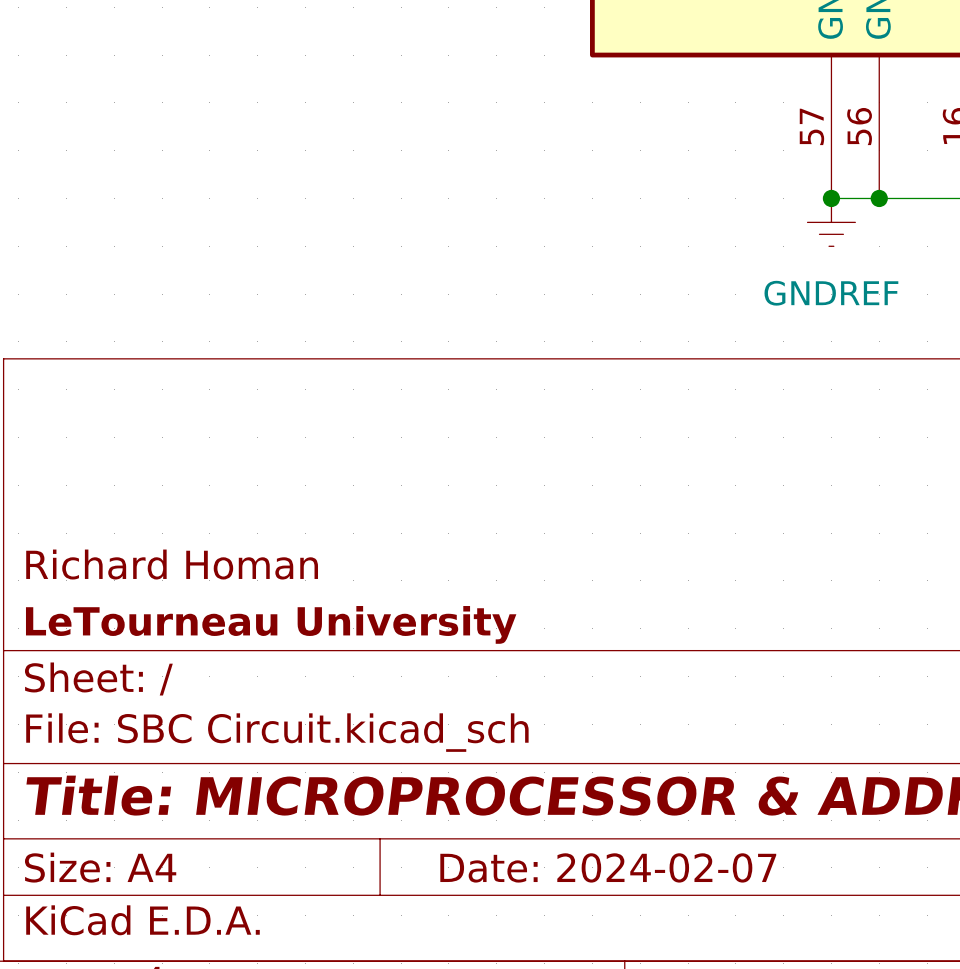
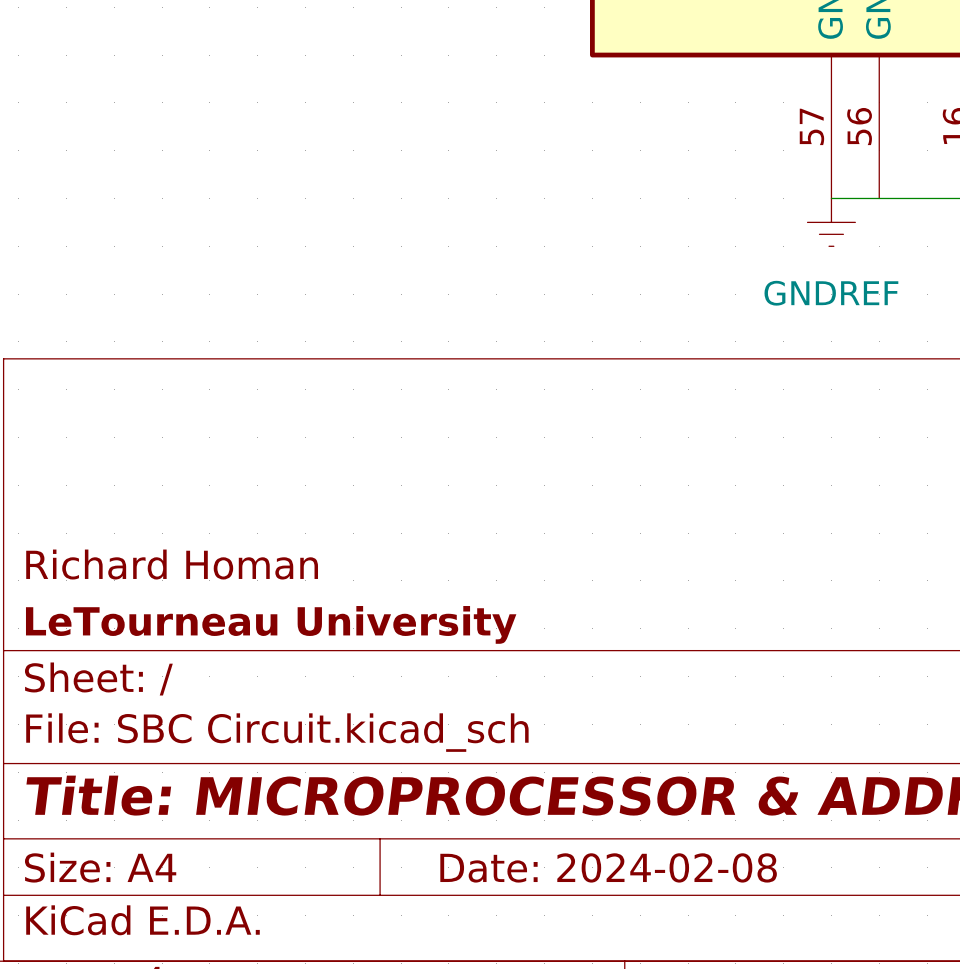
junction: (831, 198) -> none
junction: (879, 198) -> none
title block: Date: 2024-02-07 (608, 867) -> Date: 2024-02-08 (608, 867)

